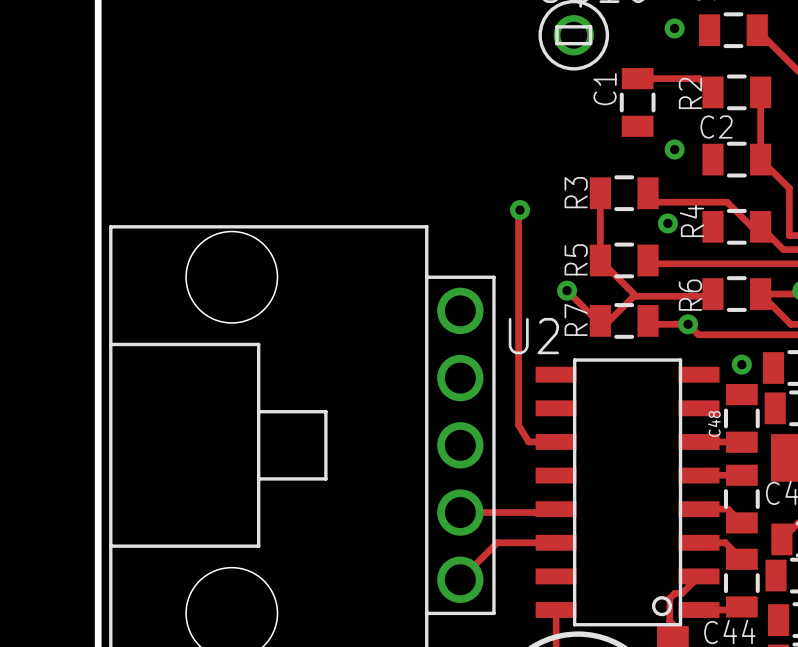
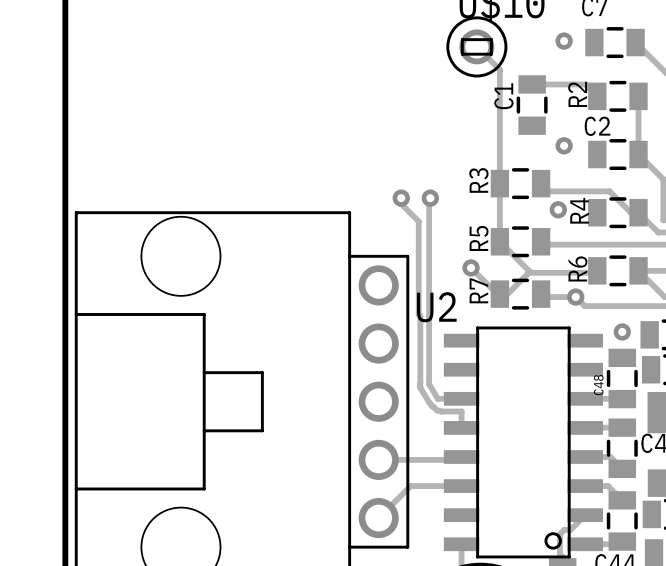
track: none -> (476, 46) (499, 69) (499, 183)
track: none -> (401, 198) (401, 203) (418, 221) (419, 385) (429, 402) (437, 410) (461, 411) (461, 427)
via: none -> (401, 198)

